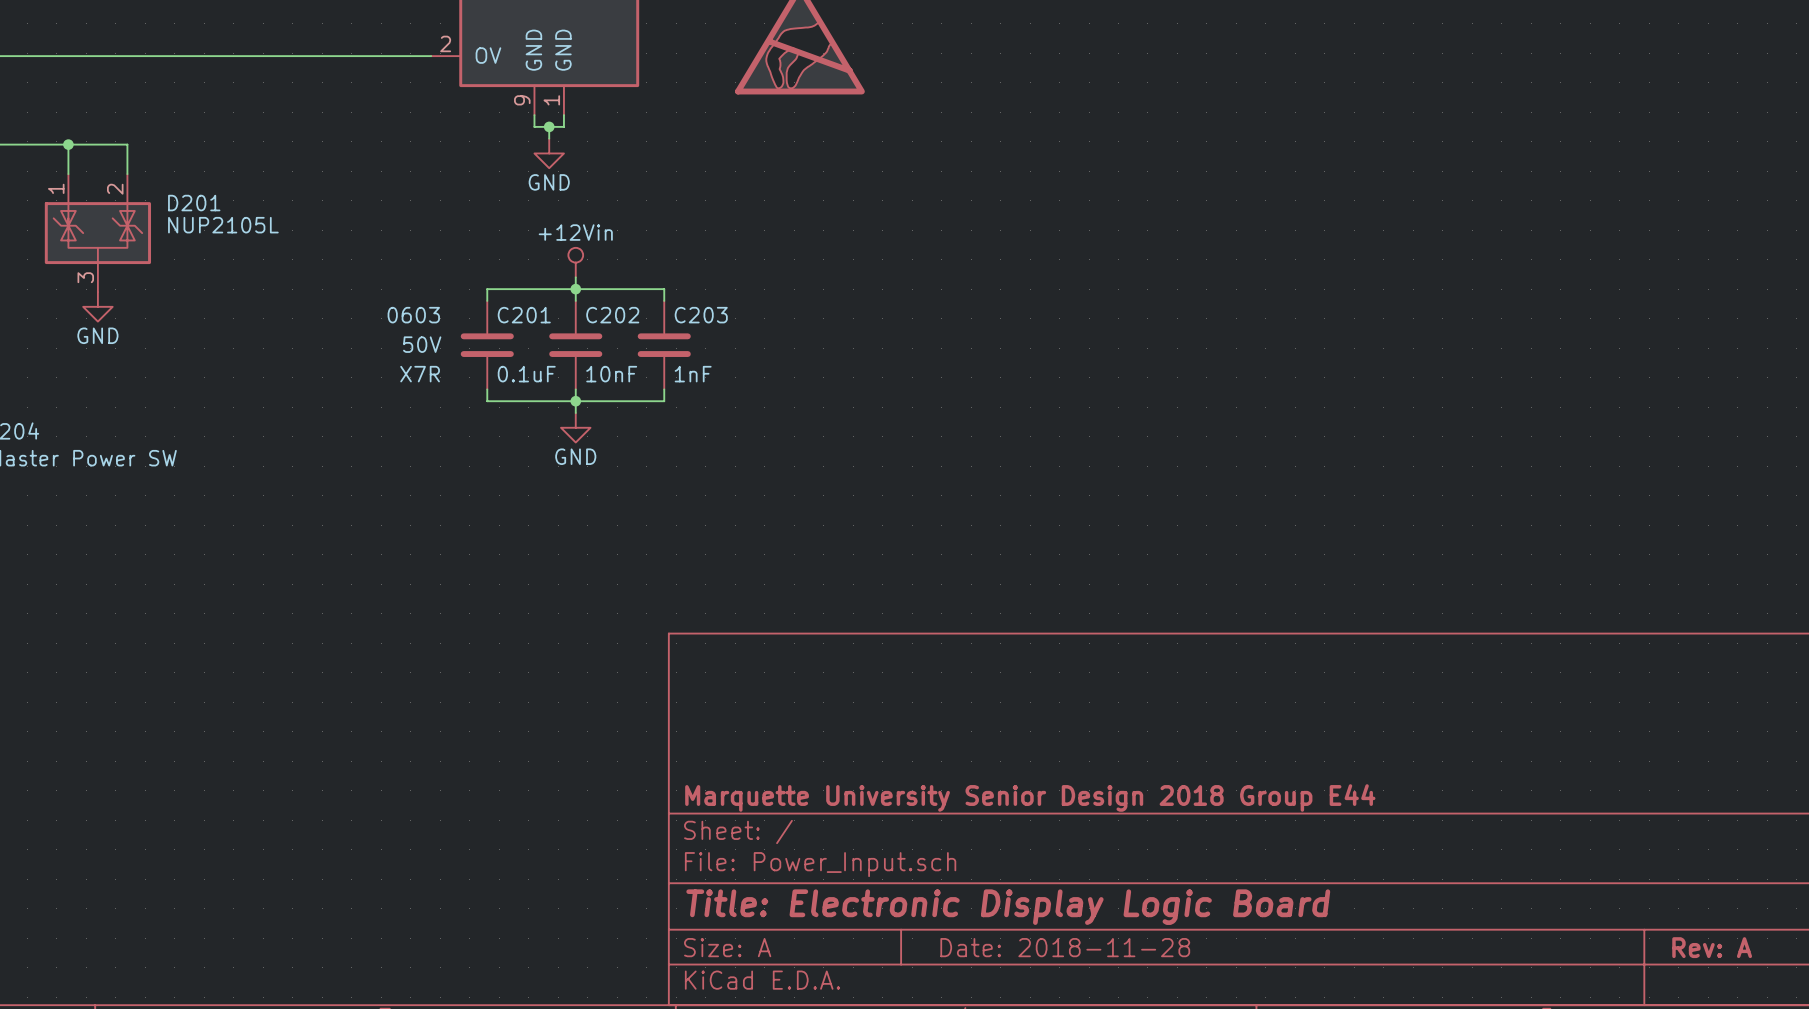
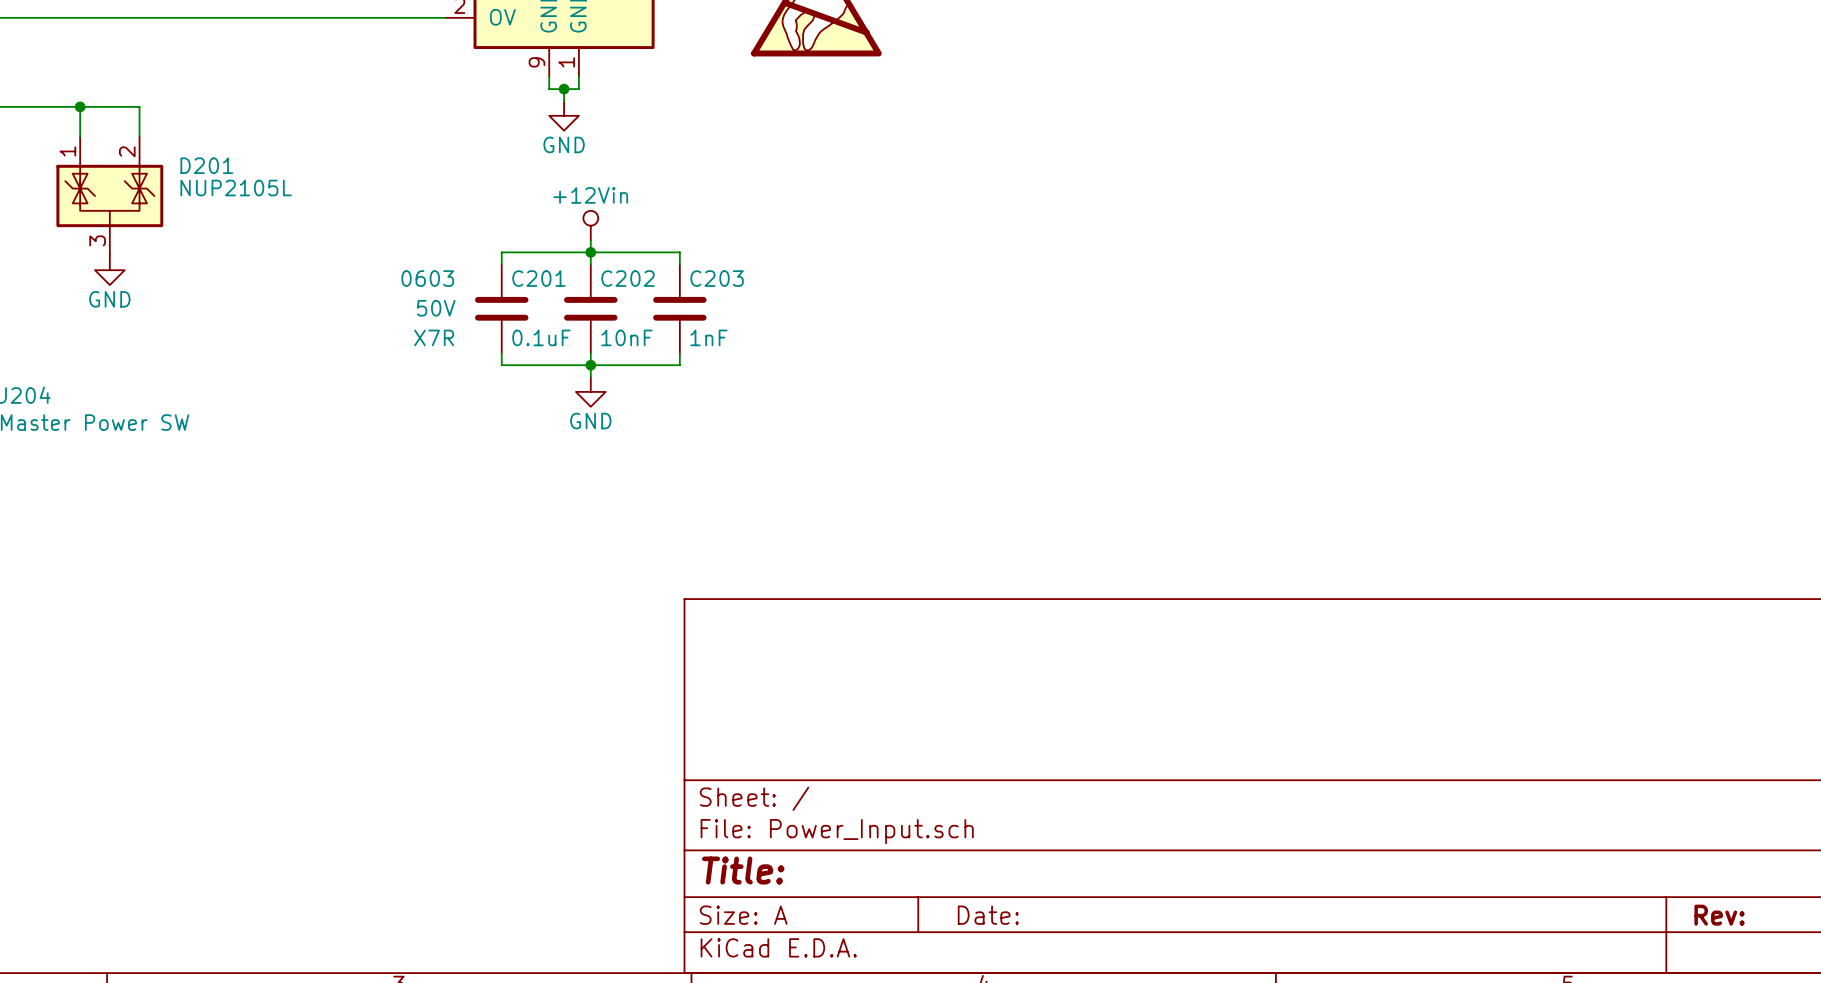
title block: Marquette University Senior Design 2018 Group E44 (1030, 797) -> none
title block: Title: Electronic Display Logic Board (1008, 907) -> Title: (743, 870)
title block: Date: 2018-11-28 (1065, 947) -> Date: (988, 915)
title block: Rev: A (1712, 947) -> Rev: (1719, 915)

